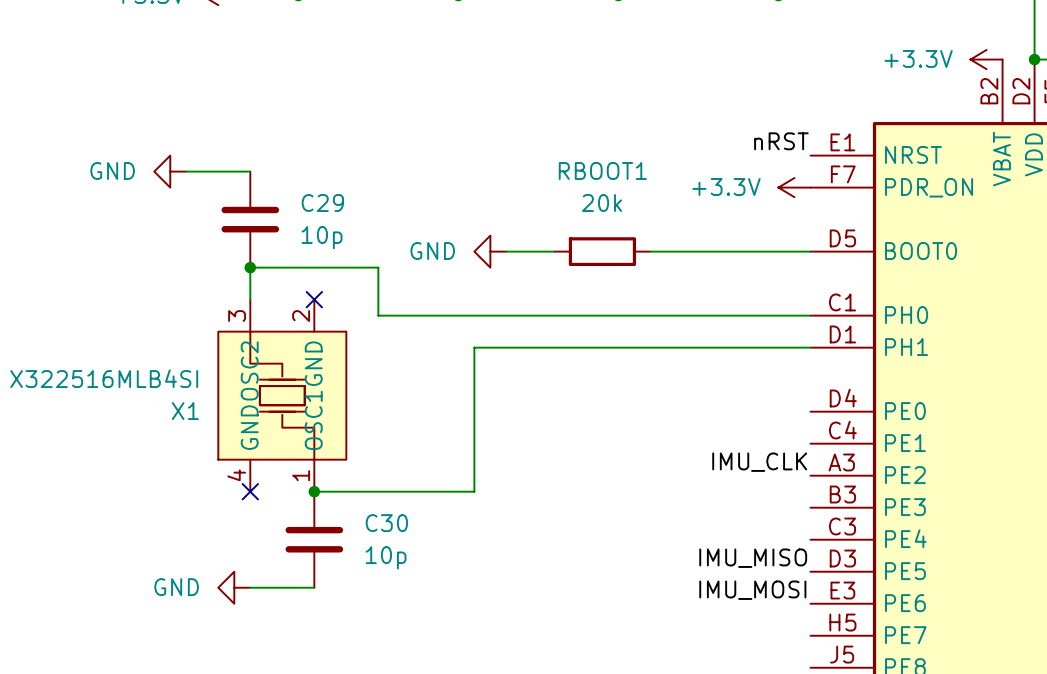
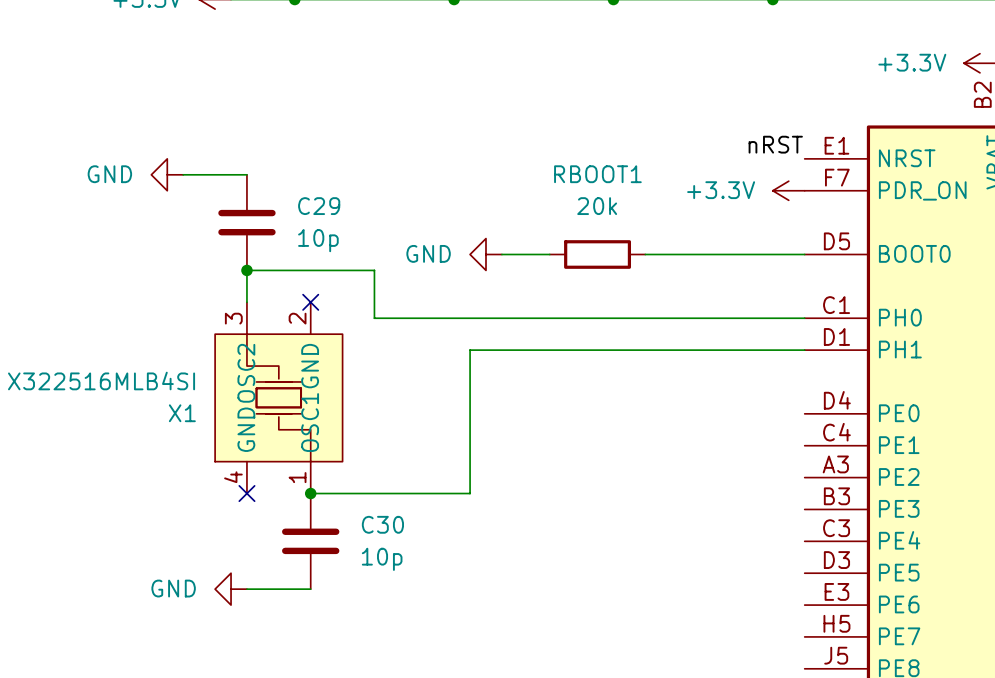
label: IMU_CLK (759, 462) -> none
label: IMU_MISO (753, 558) -> none
label: IMU_MOSI (752, 590) -> none

